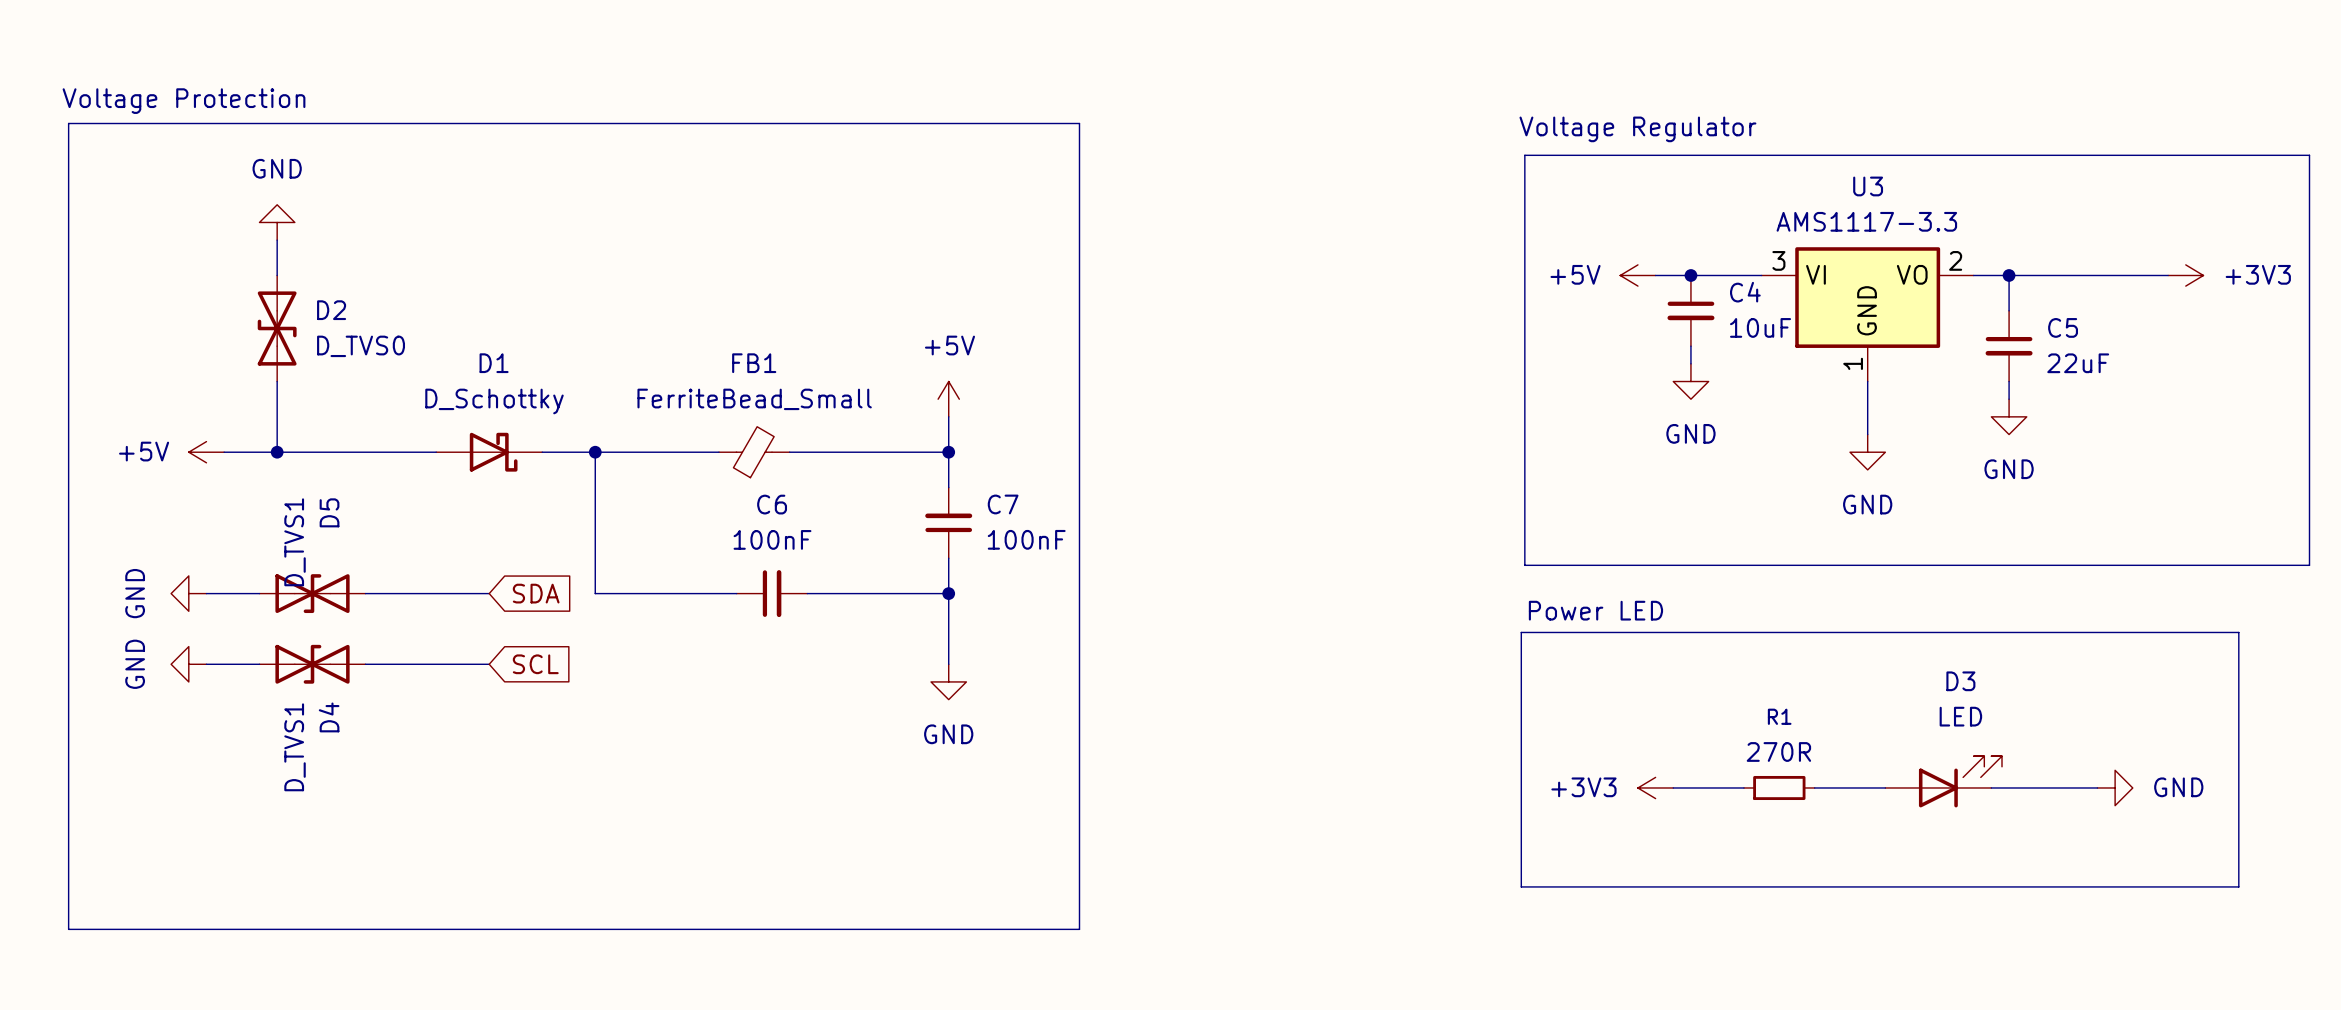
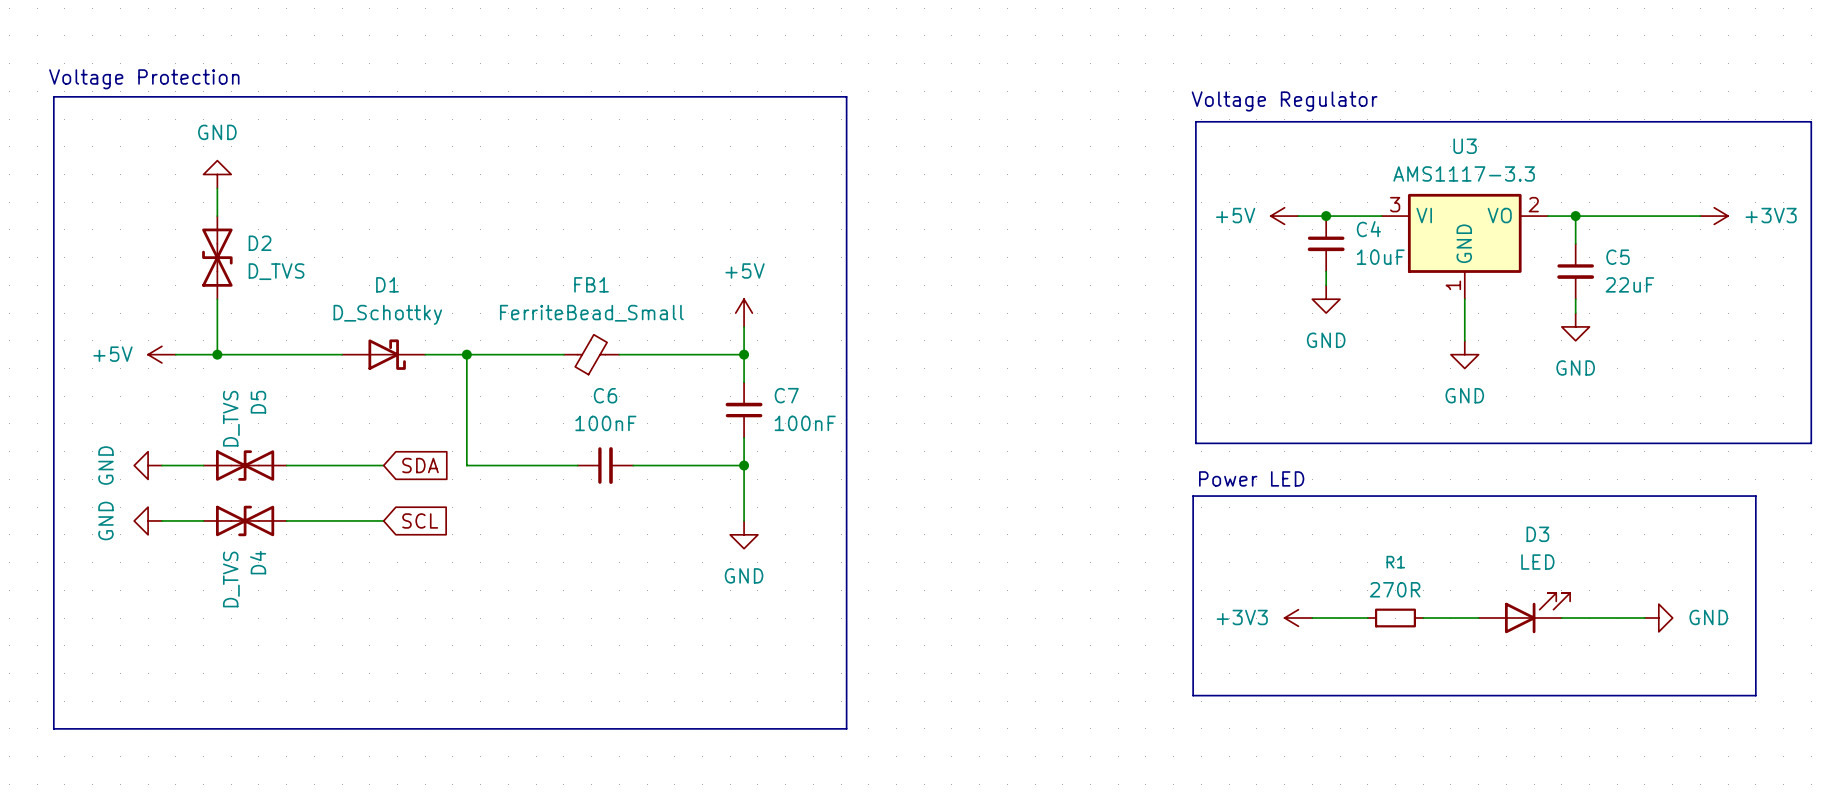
D2 value: D_TVS0 (361, 346) -> D_TVS (276, 271)
D5 value: D_TVS1 (295, 542) -> D_TVS (231, 418)
D4 value: D_TVS1 (295, 747) -> D_TVS (231, 579)

